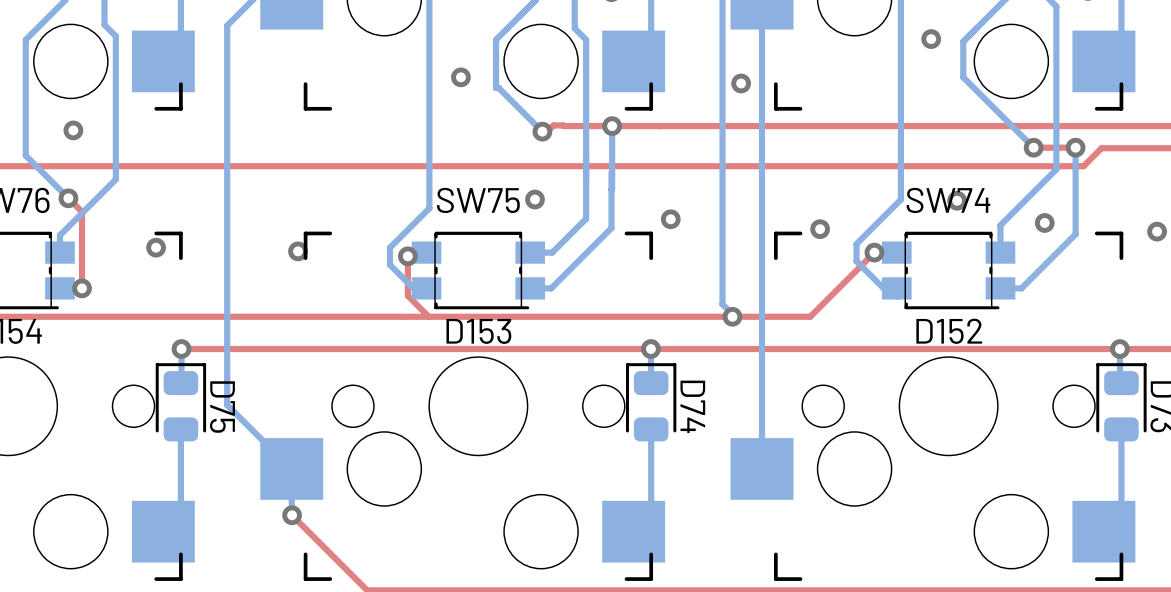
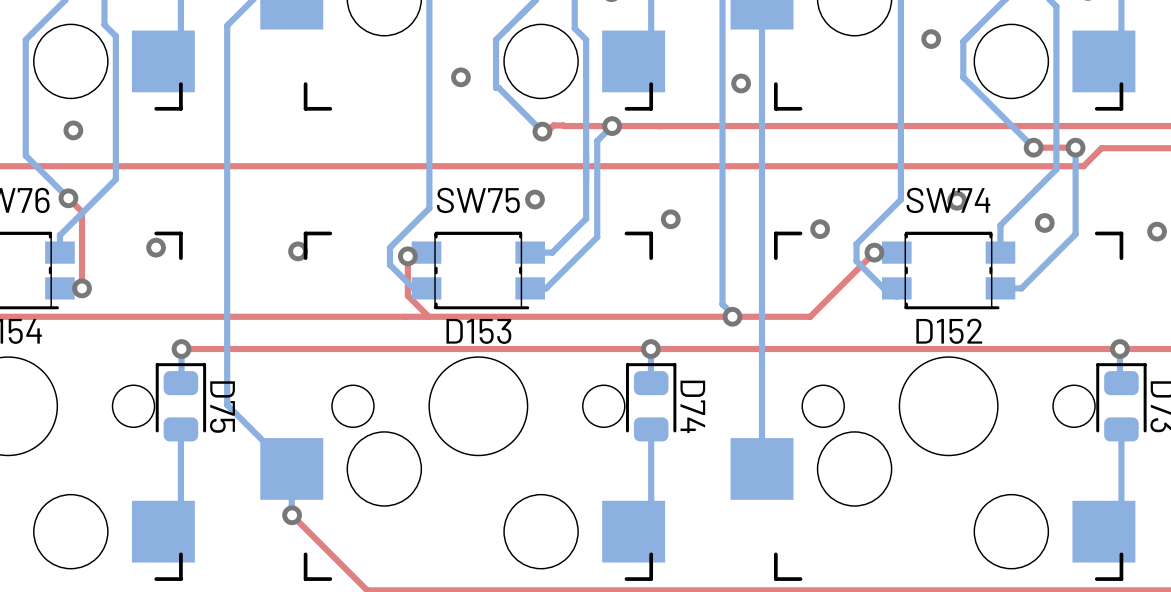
bottom track: (612, 126) (611, 189) -> none
bottom track: (611, 172) (611, 228) (551, 288) (546, 288) -> (612, 126) (597, 140) (597, 237) (546, 288)

